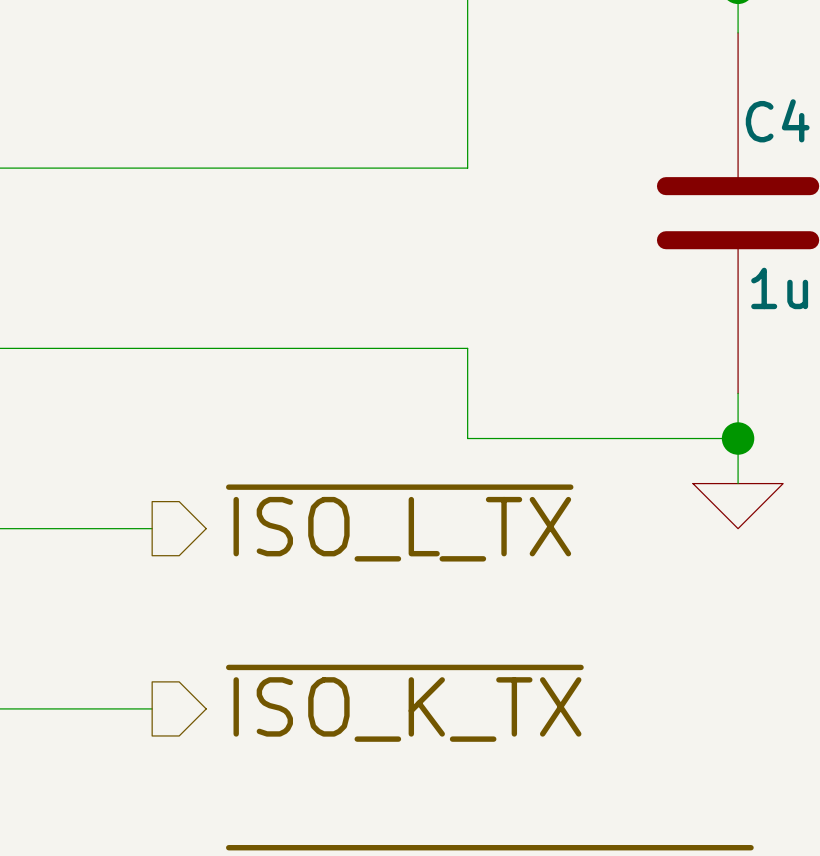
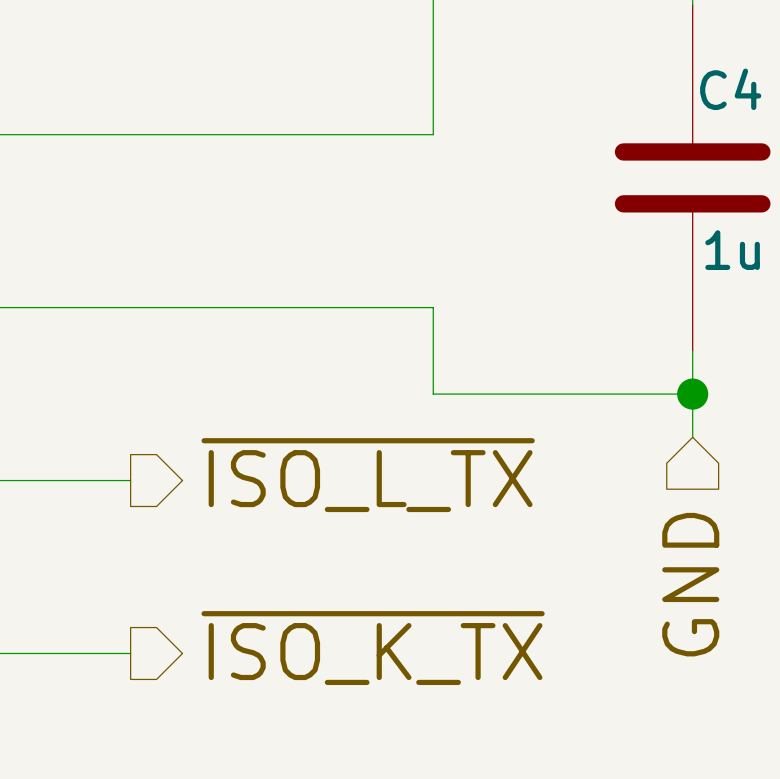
power symbol: (738, 506) -> none
hierarchical label: none -> GND (690, 584)

